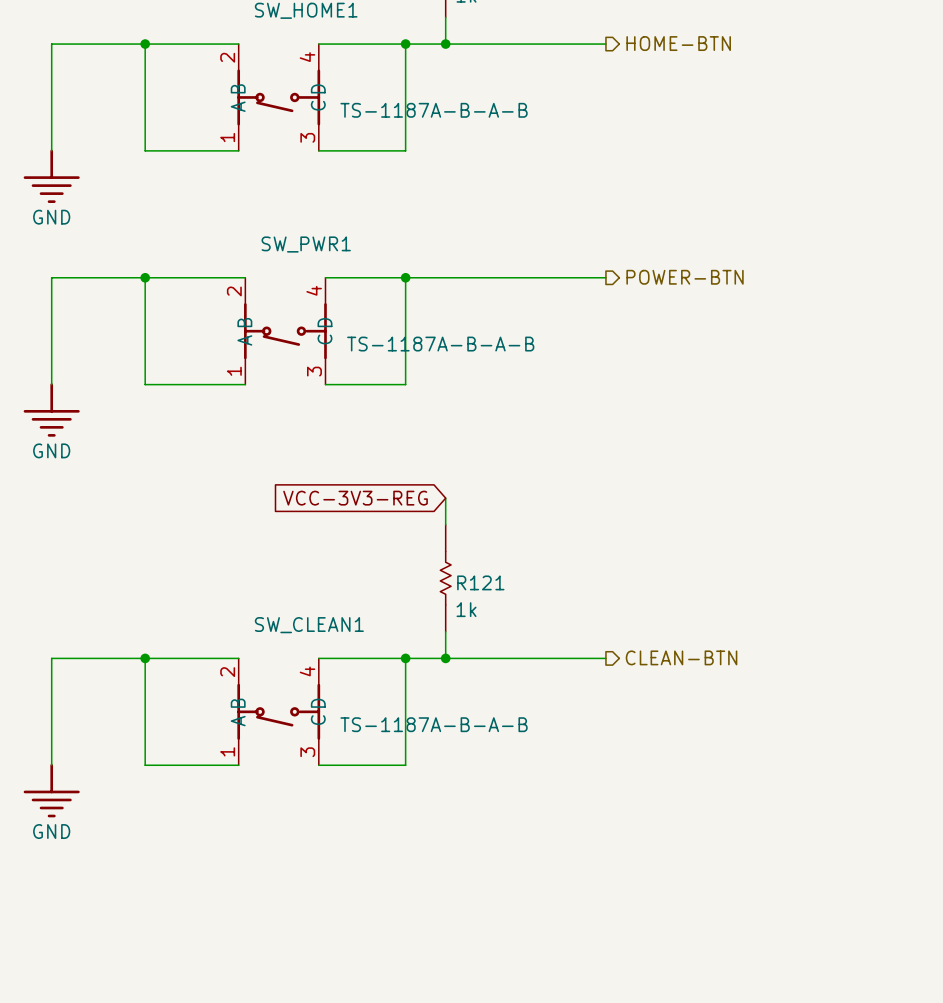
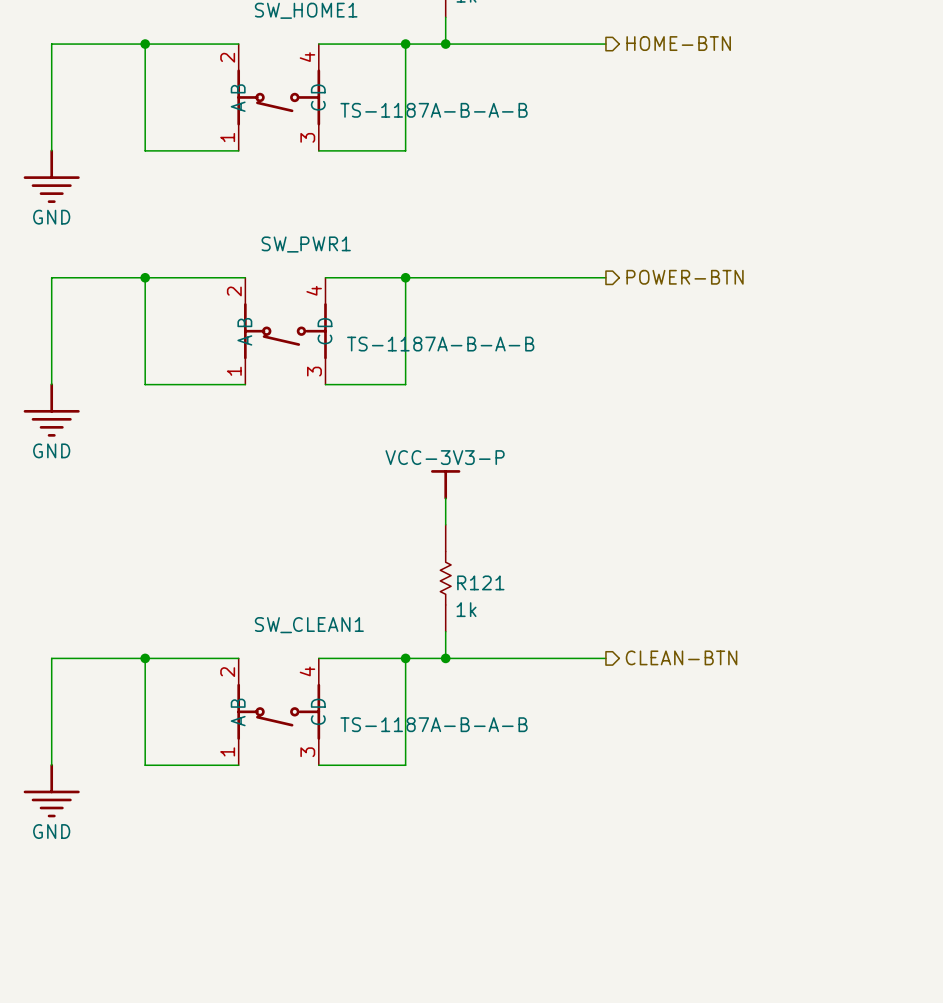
power symbol: none -> VCC-3V3-P (445, 484)
global label: VCC-3V3-REG (355, 498) -> none

